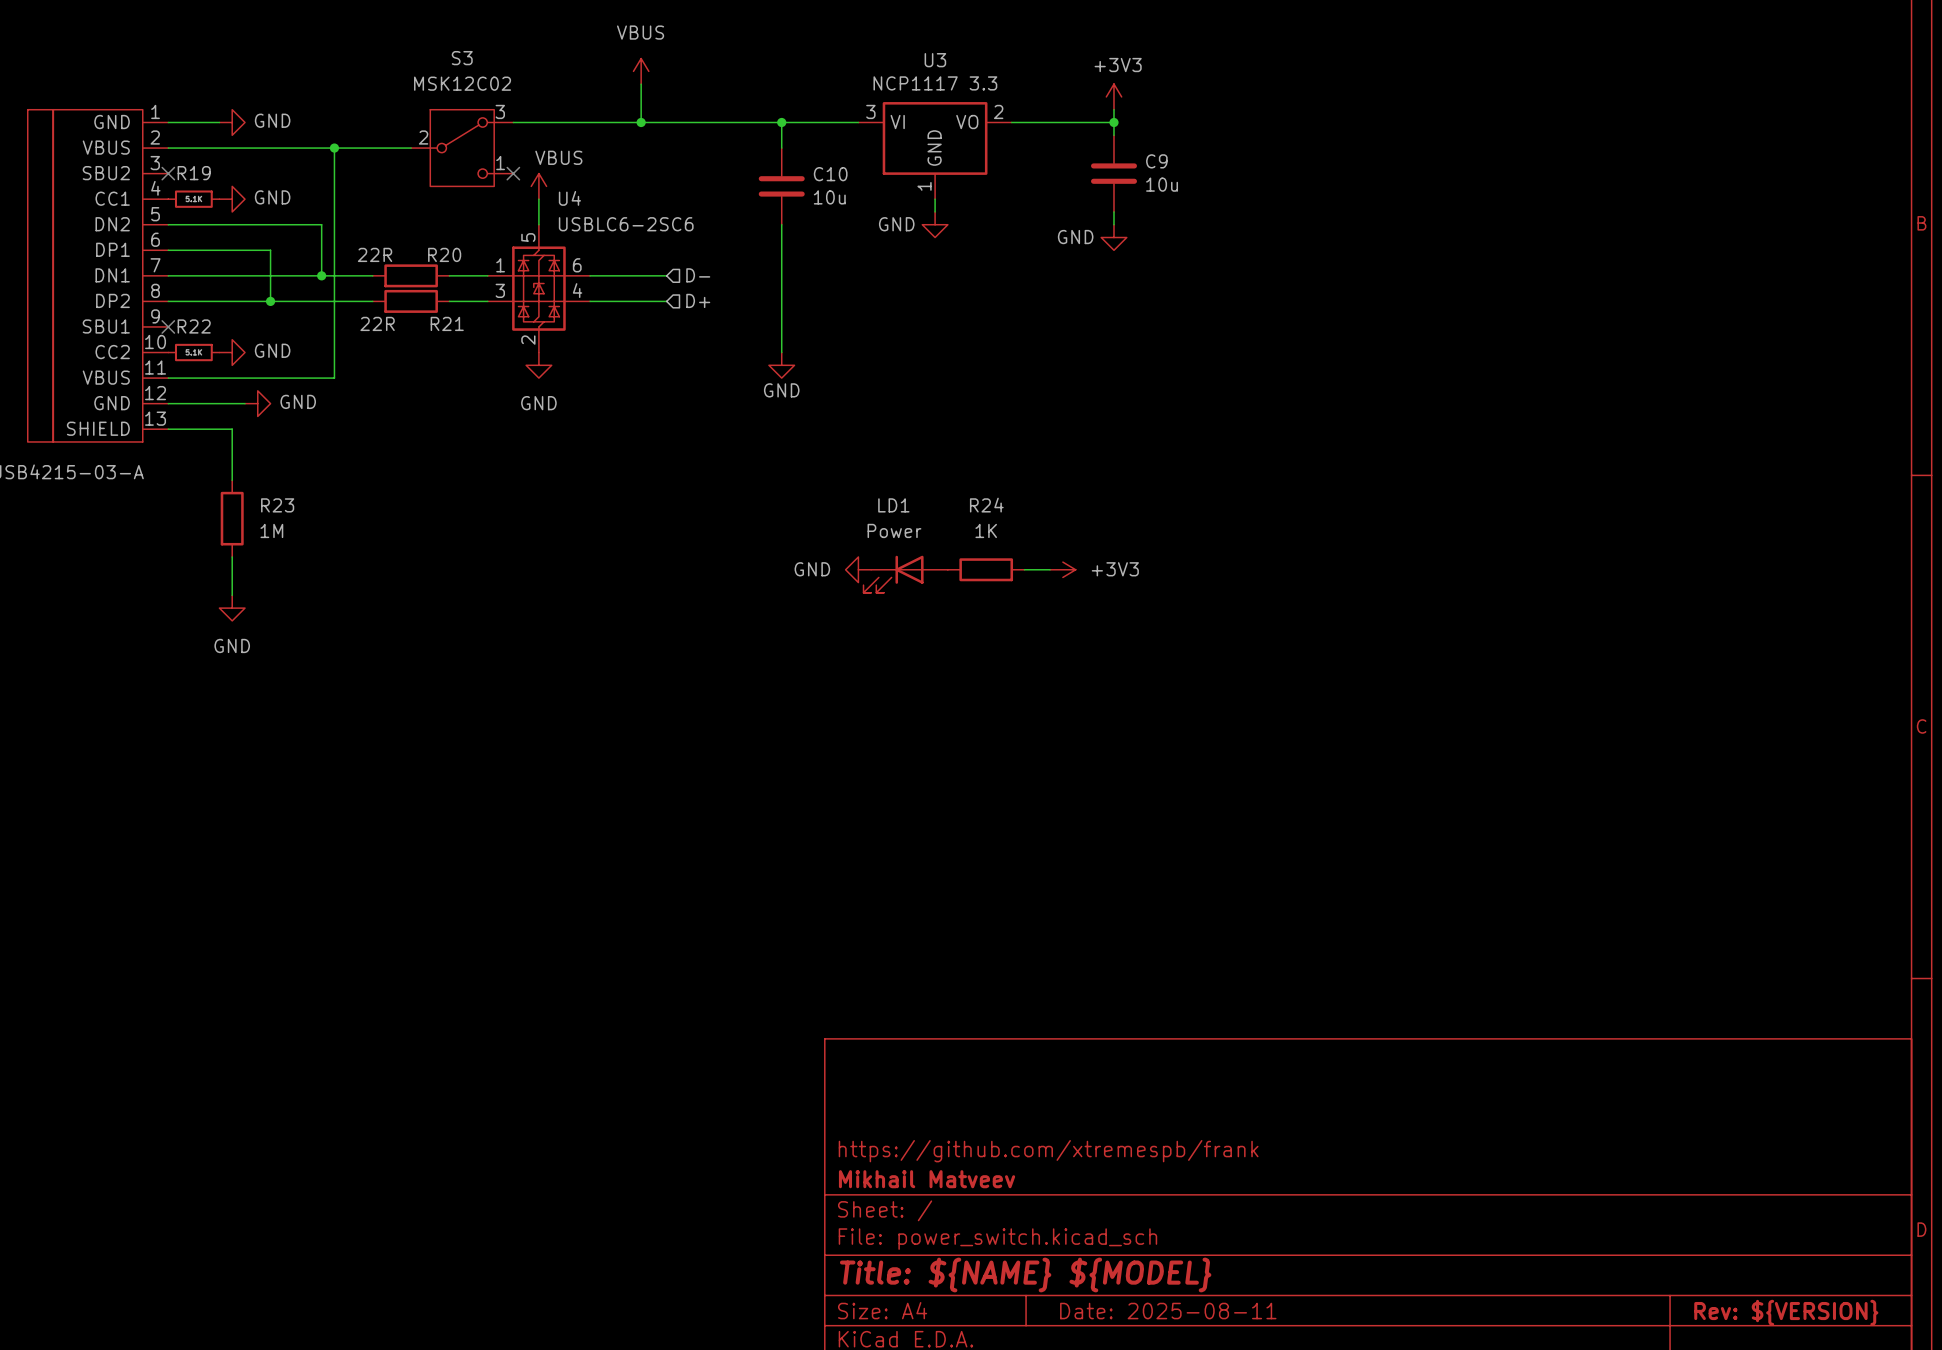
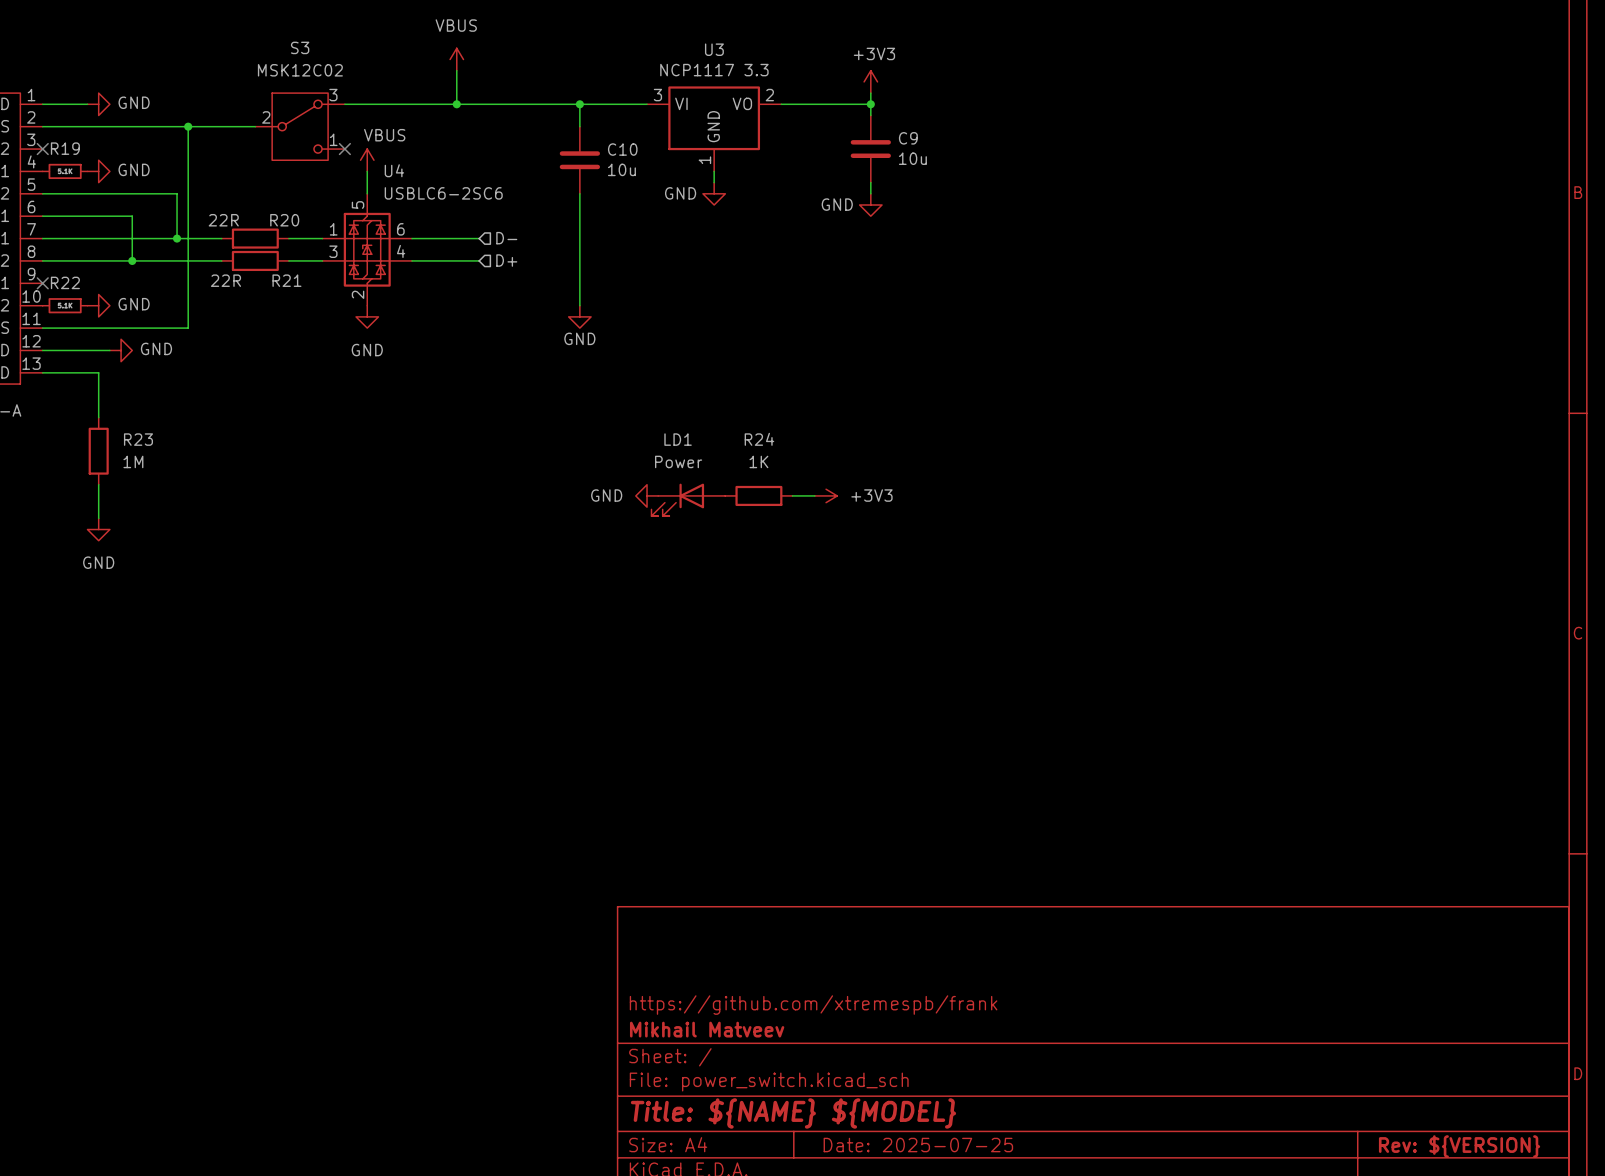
title block: Date: 2025-08-11 (1168, 1311) -> Date: 2025-07-25 (918, 1145)

